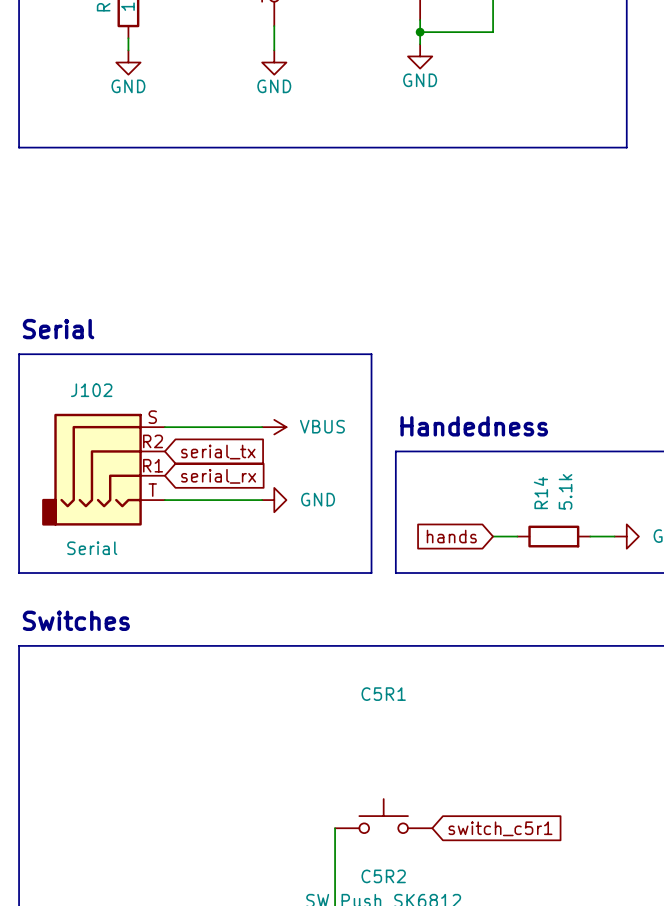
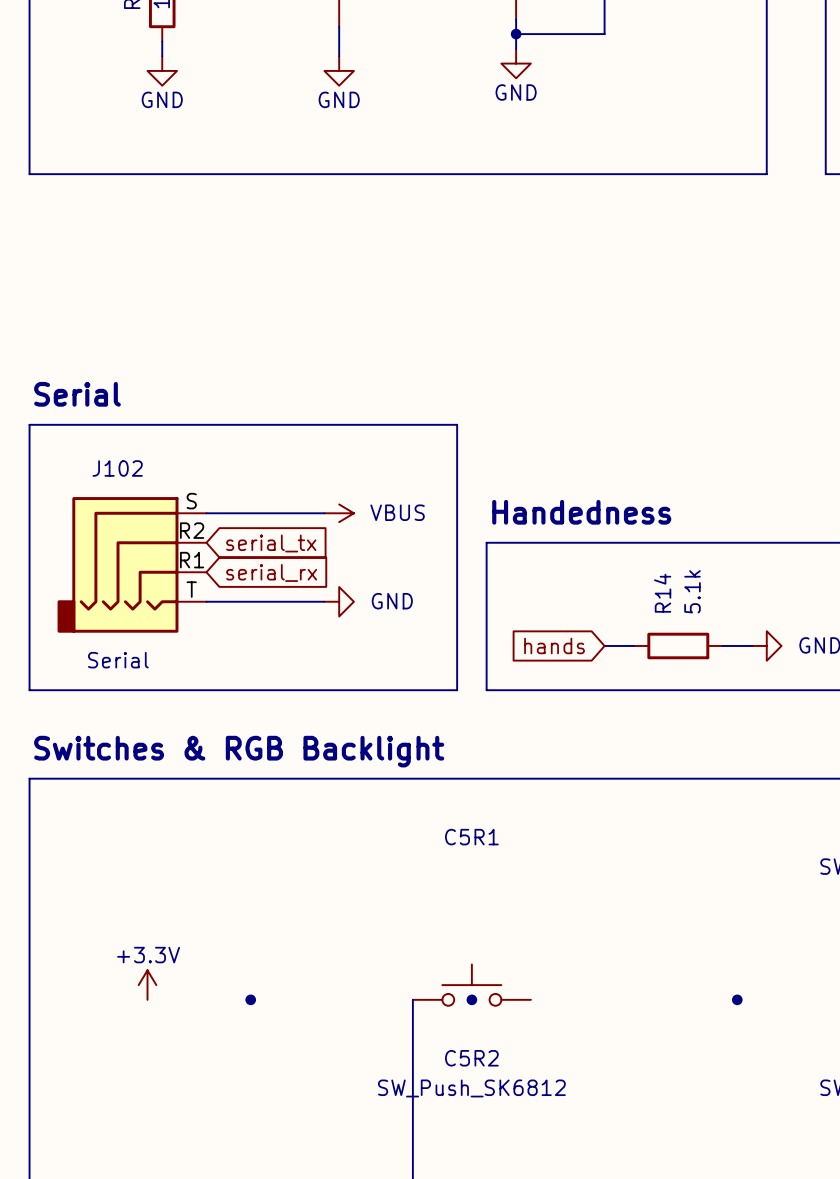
text: Switches (76, 620) -> Switches & RGB Backlight (239, 751)
power symbol: none -> +3.3V (147, 985)
junction: none -> (250, 999)
junction: none -> (471, 999)
global label: switch_c5r1 (500, 828) -> none
junction: none -> (737, 999)

